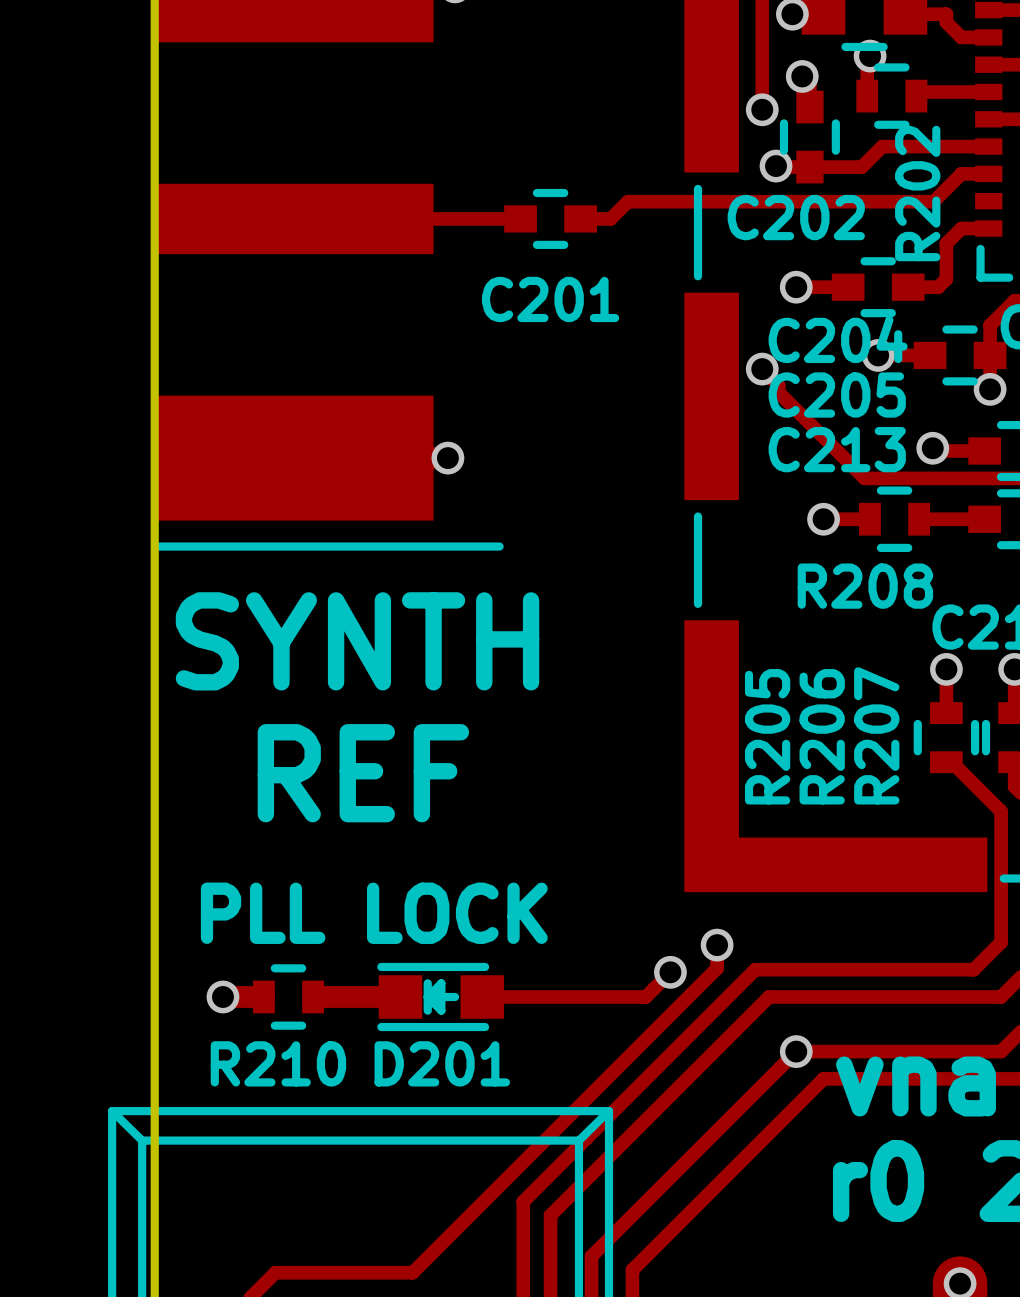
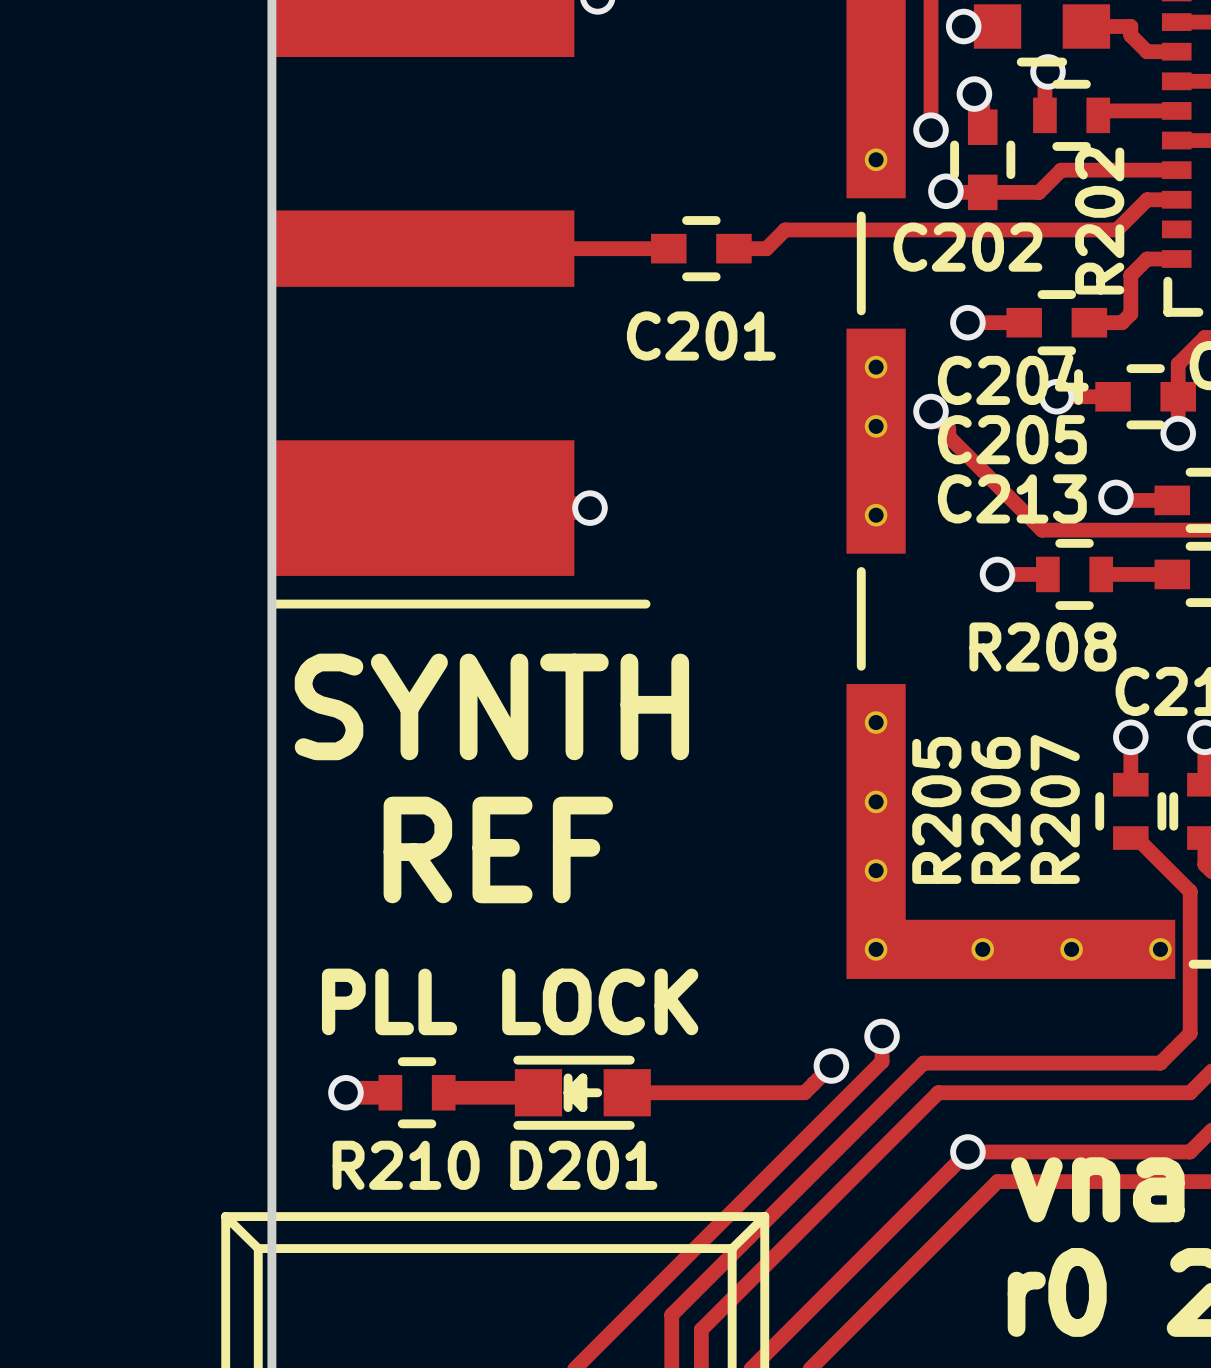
part: none -> (876, 159)
part: none -> (876, 367)
part: none -> (876, 426)
part: none -> (876, 515)
part: none -> (876, 722)
part: none -> (876, 801)
part: none -> (876, 870)
part: none -> (876, 949)
part: none -> (982, 949)
part: none -> (1071, 949)
part: none -> (1160, 949)

